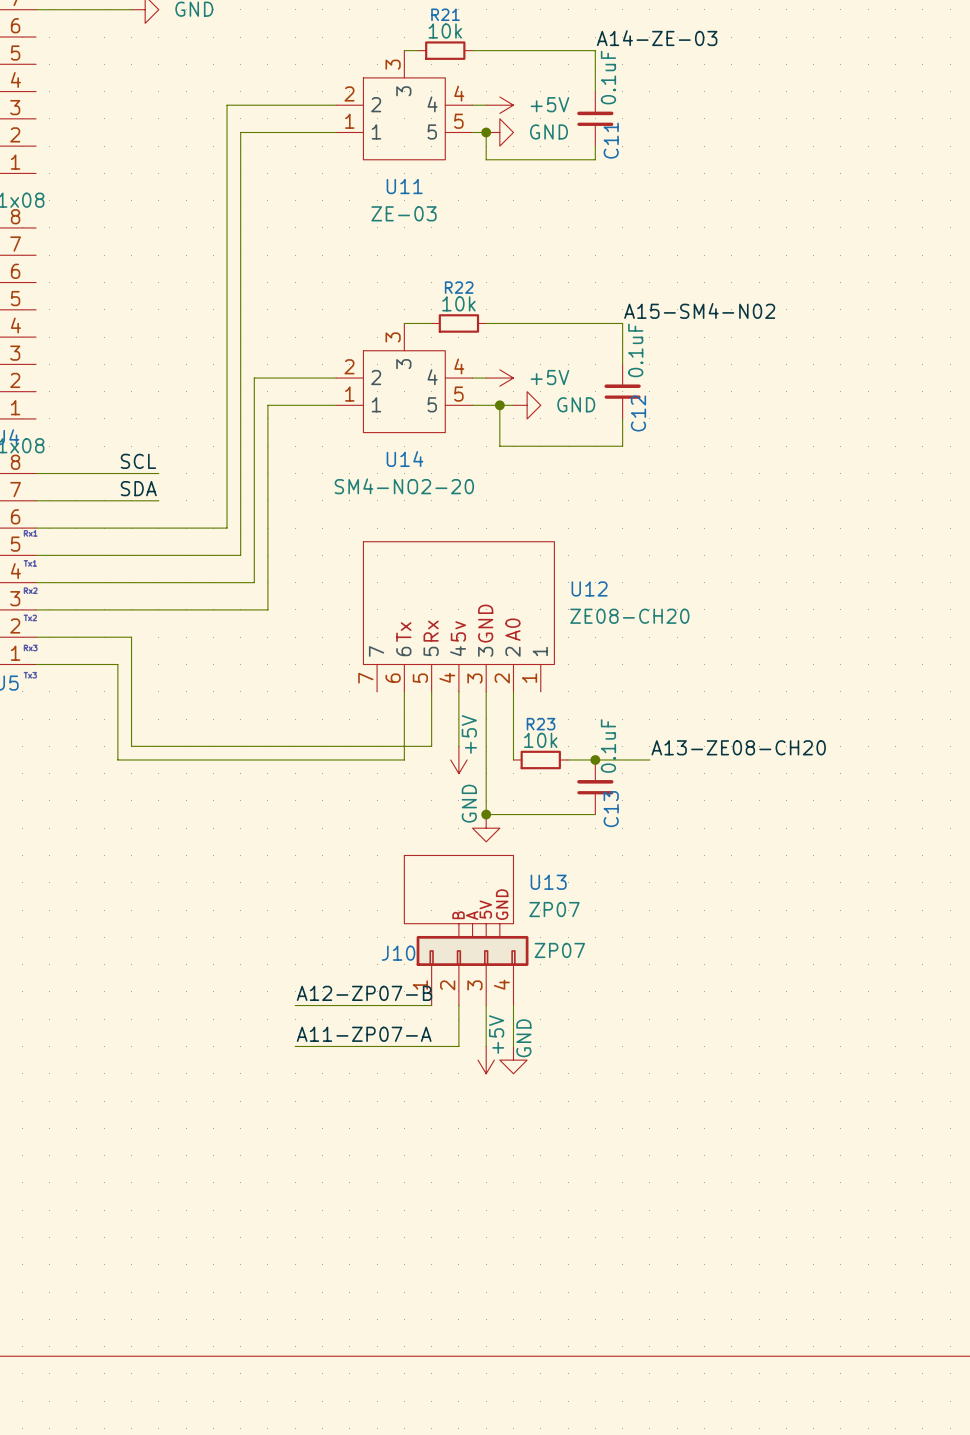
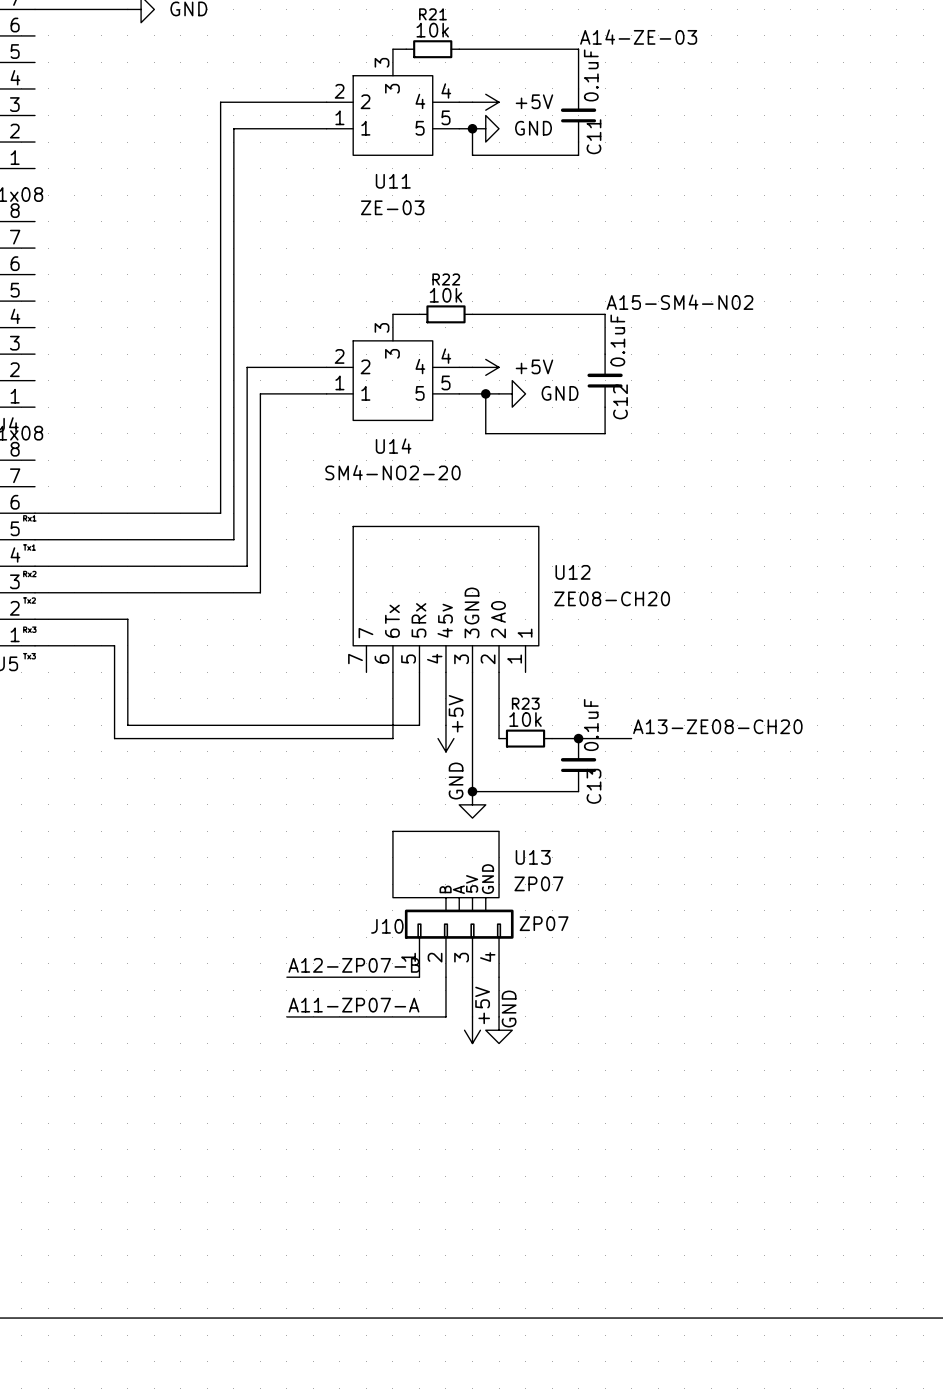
label: SCL (138, 461) -> none
wire: (36, 473) (158, 473) -> none
label: SDA (138, 488) -> none
wire: (36, 500) (158, 500) -> none

